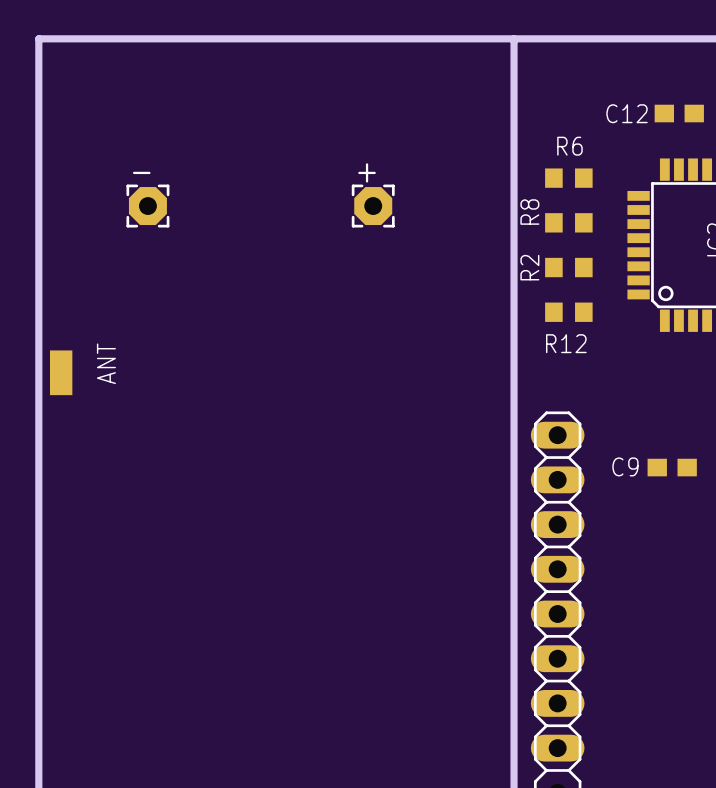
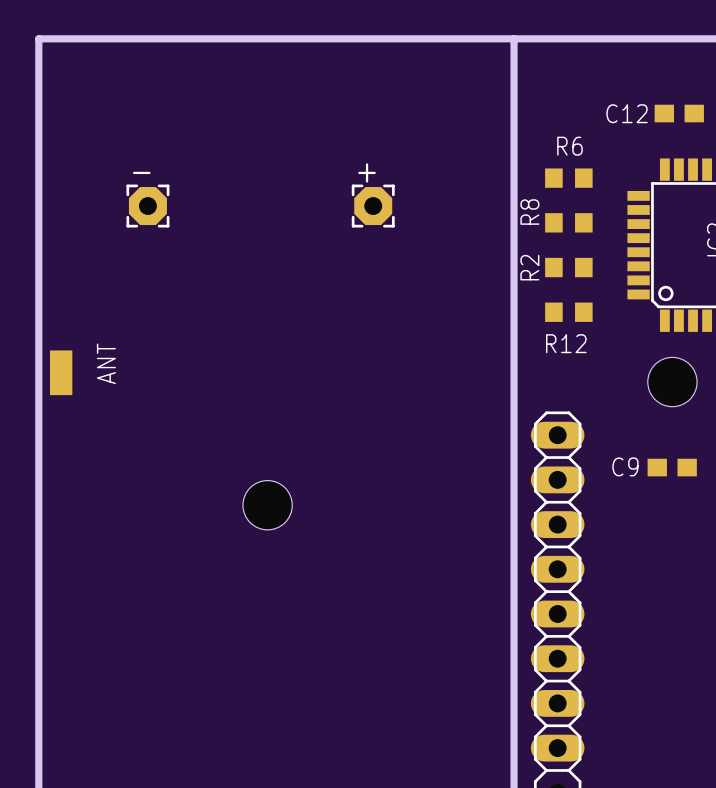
hole: none -> (672, 382)
hole: none -> (267, 505)

